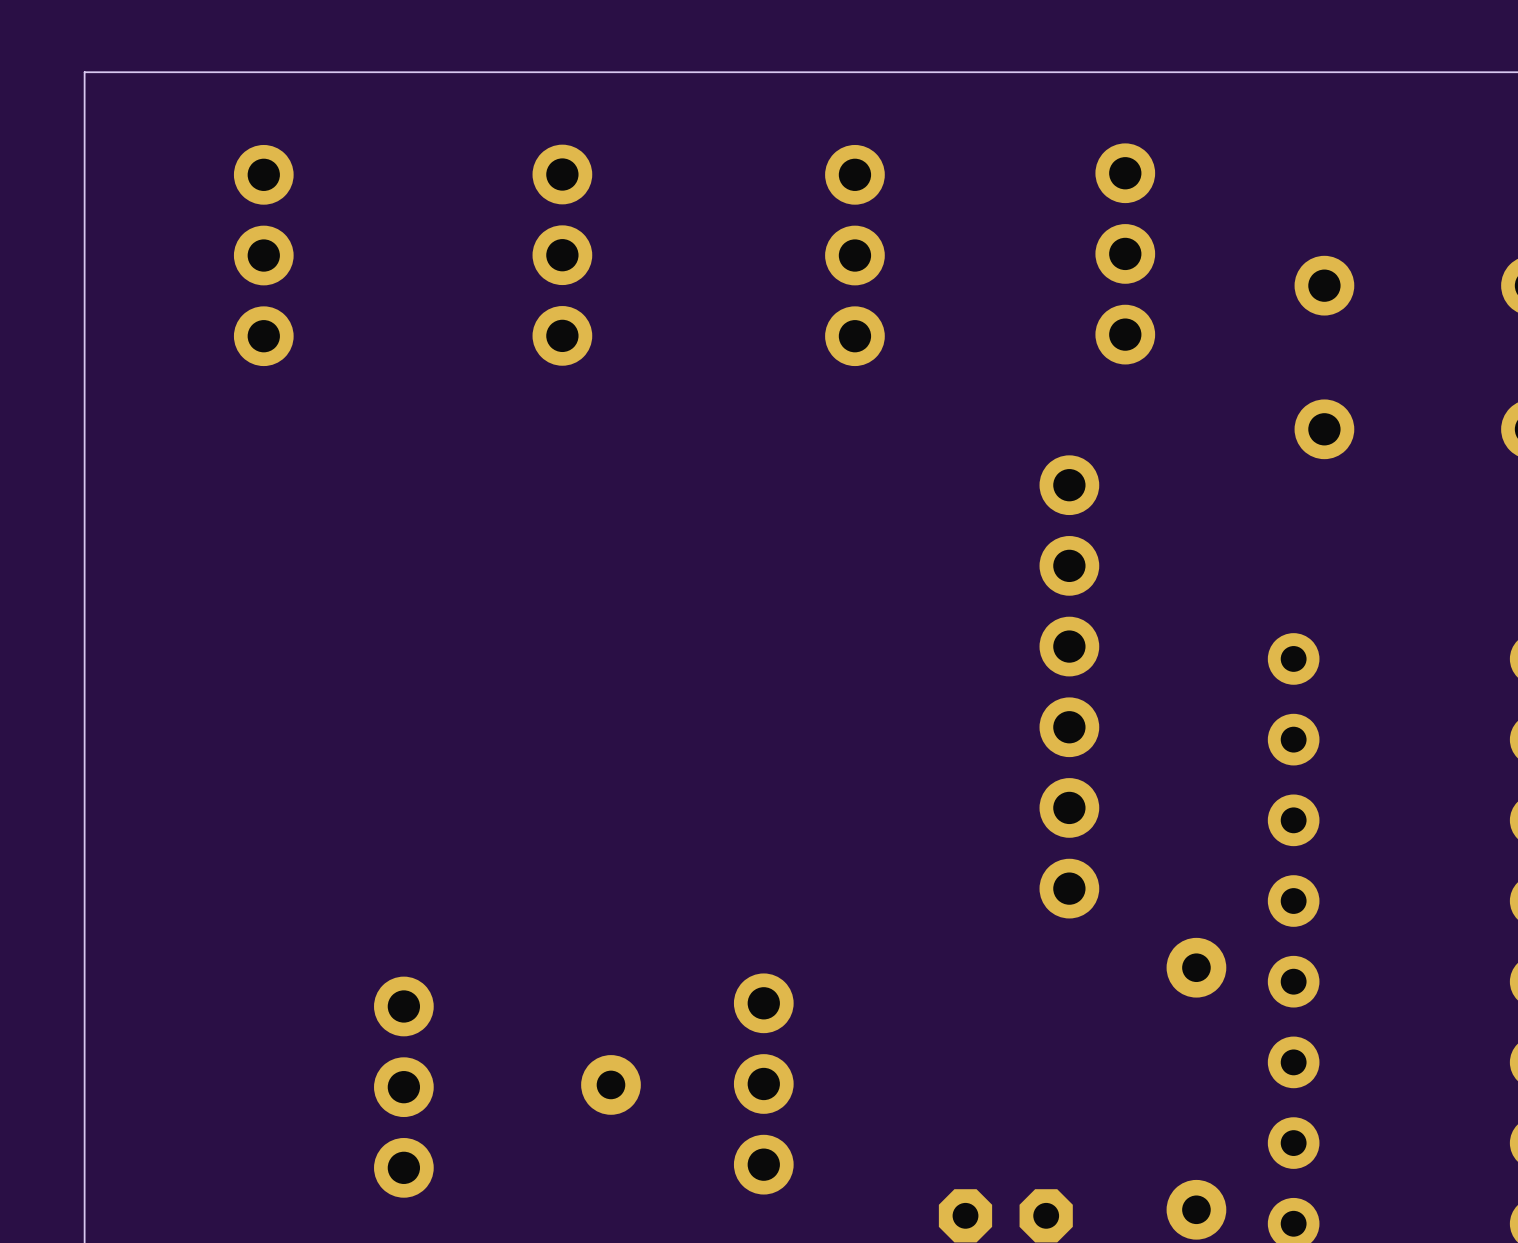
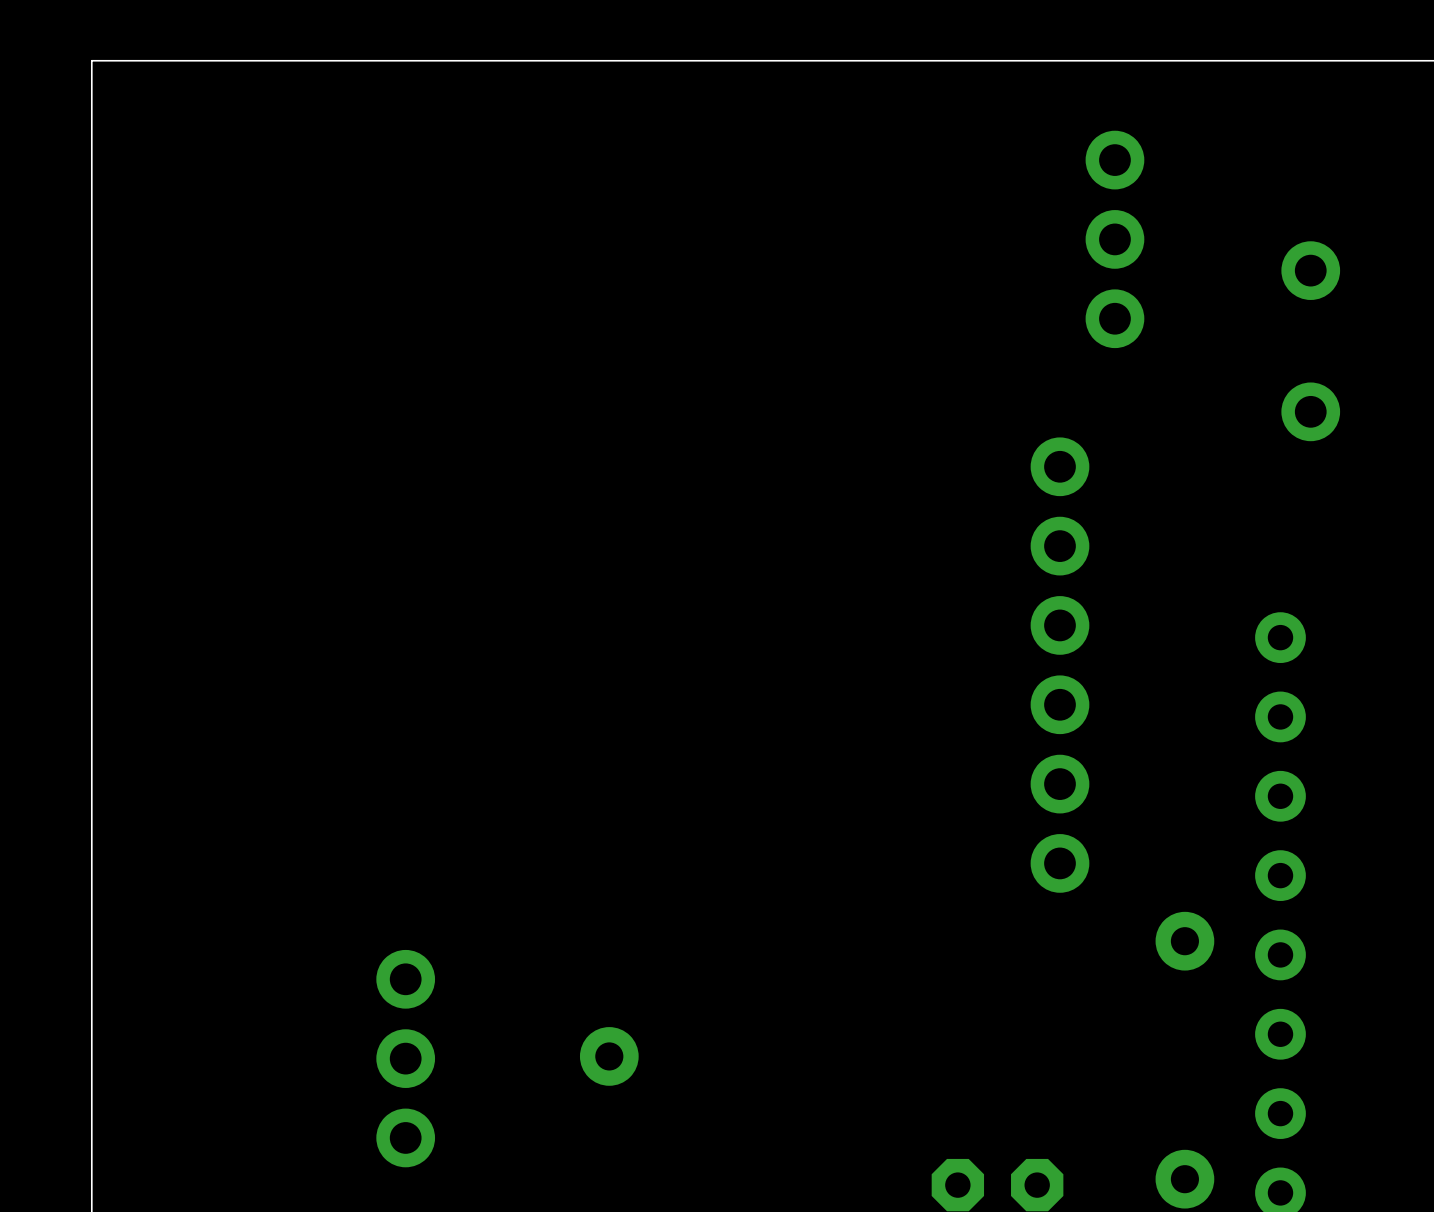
part: (263, 255) -> none
part: (562, 255) -> none
part: (854, 255) -> none
part: (763, 1083) -> none

